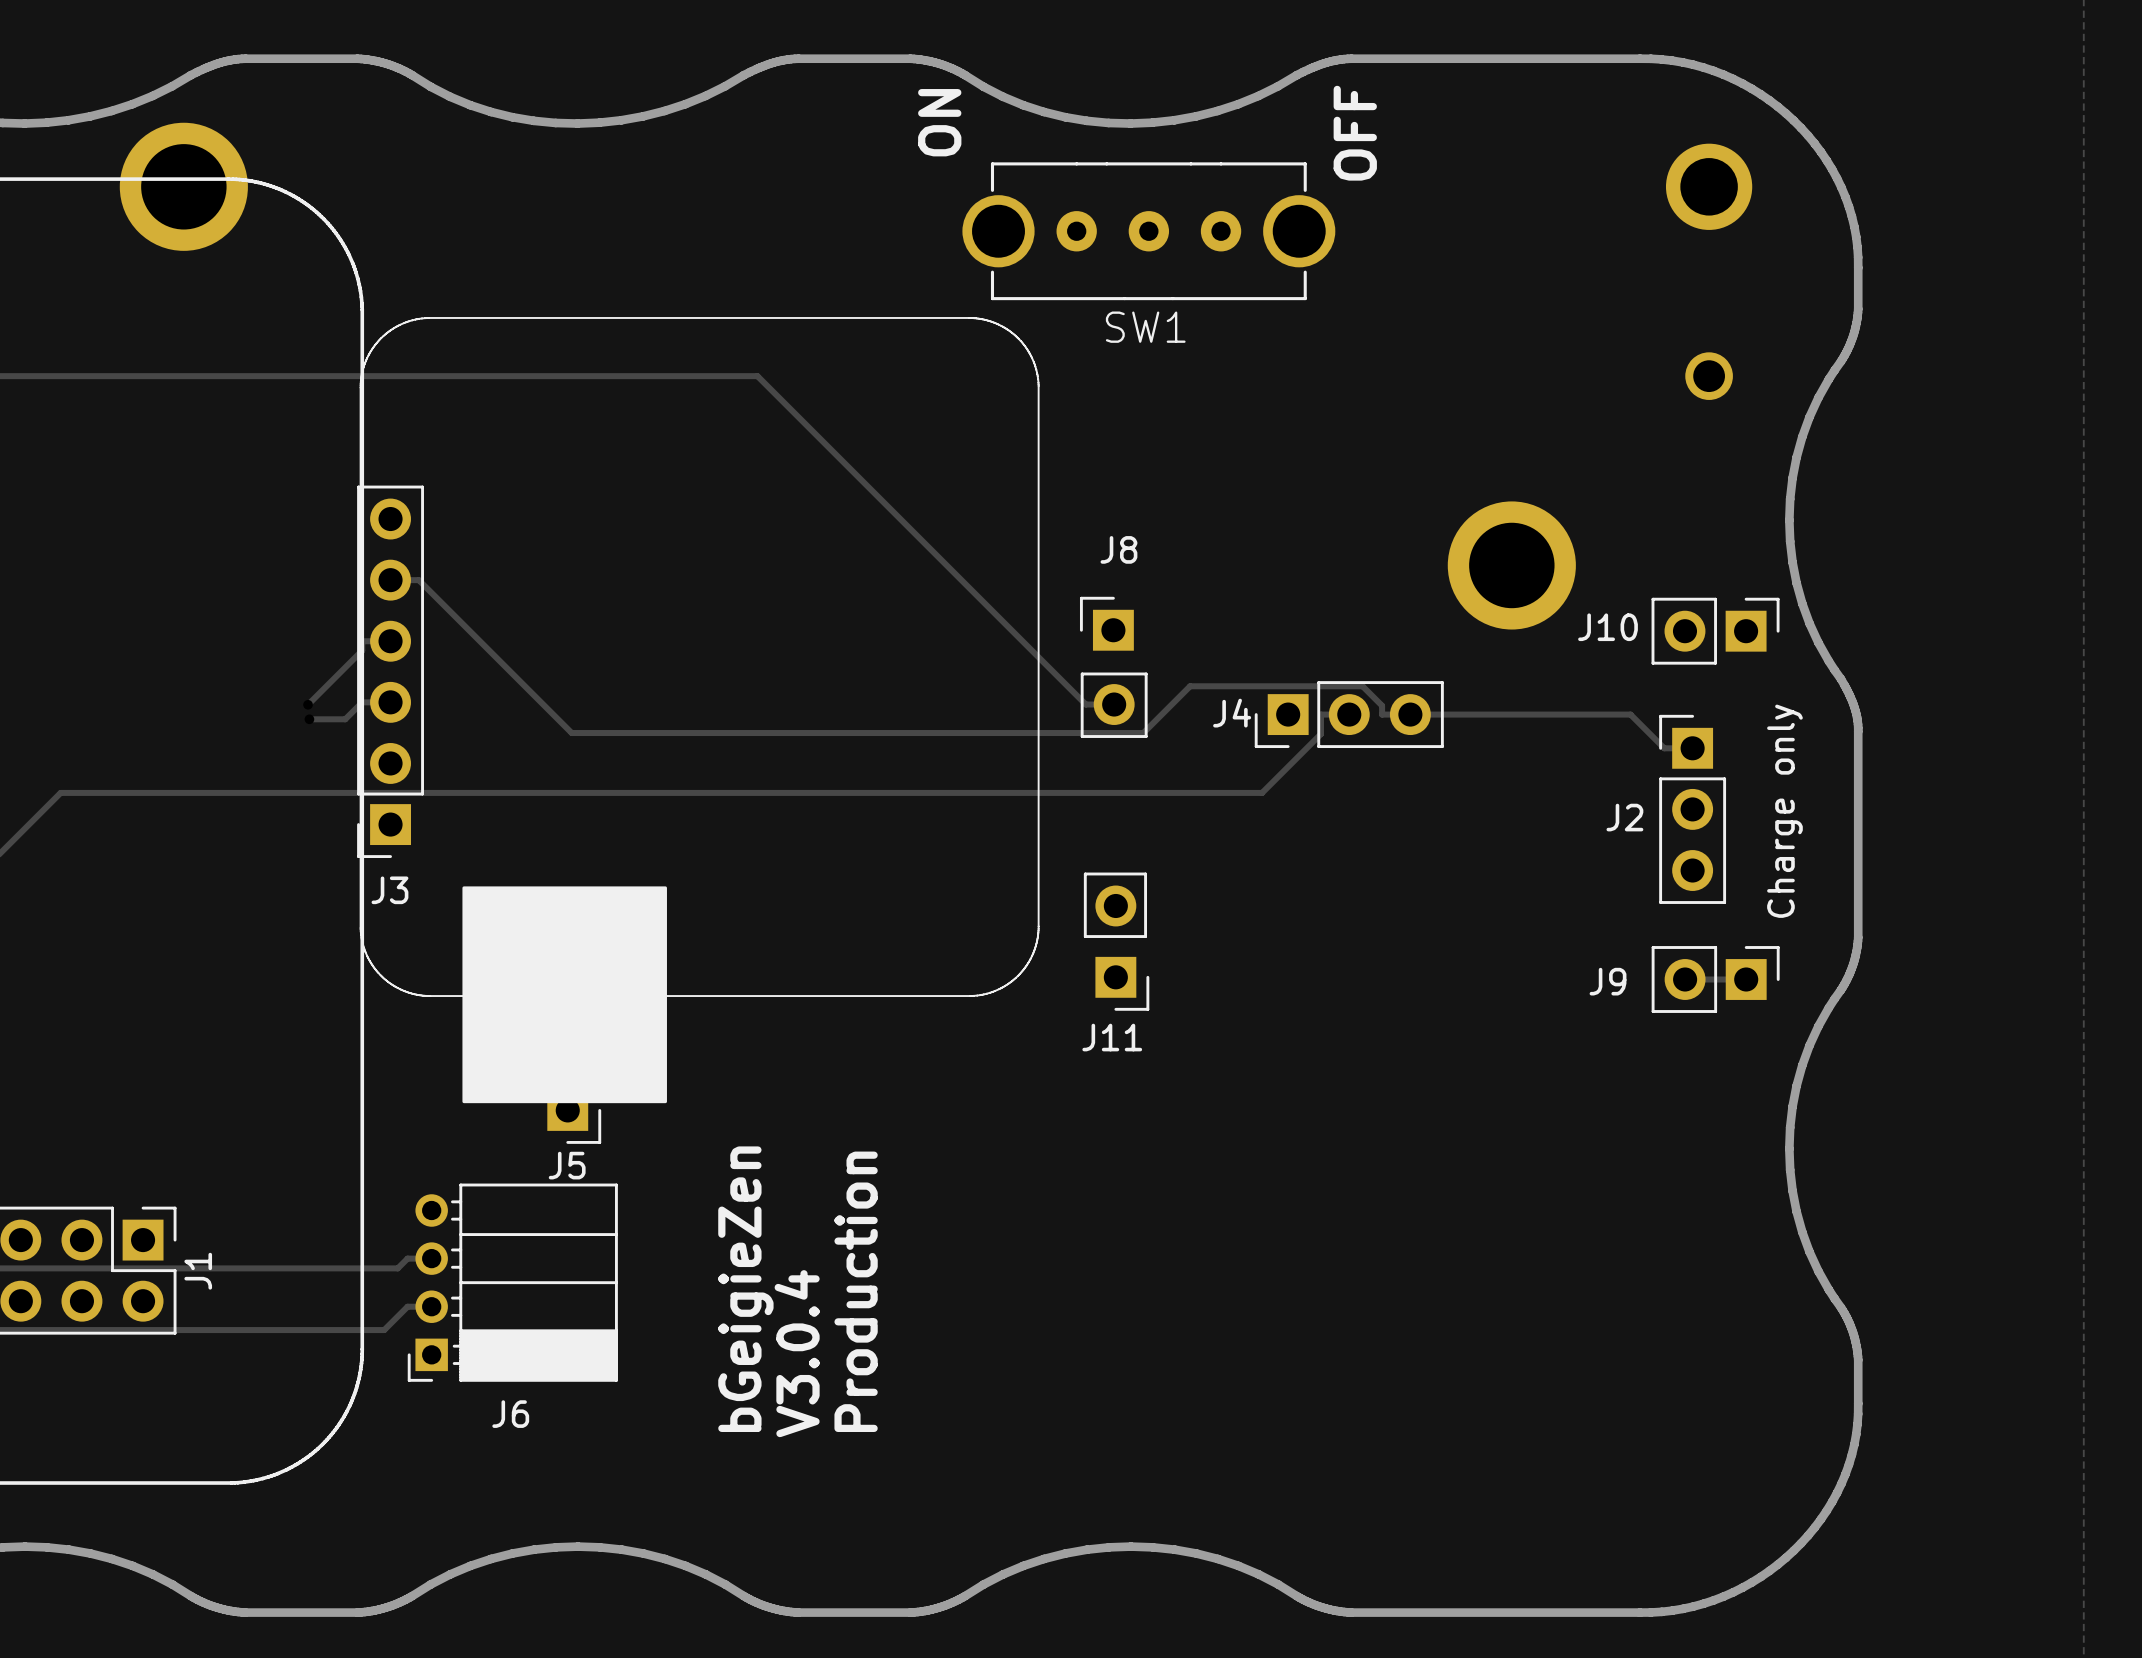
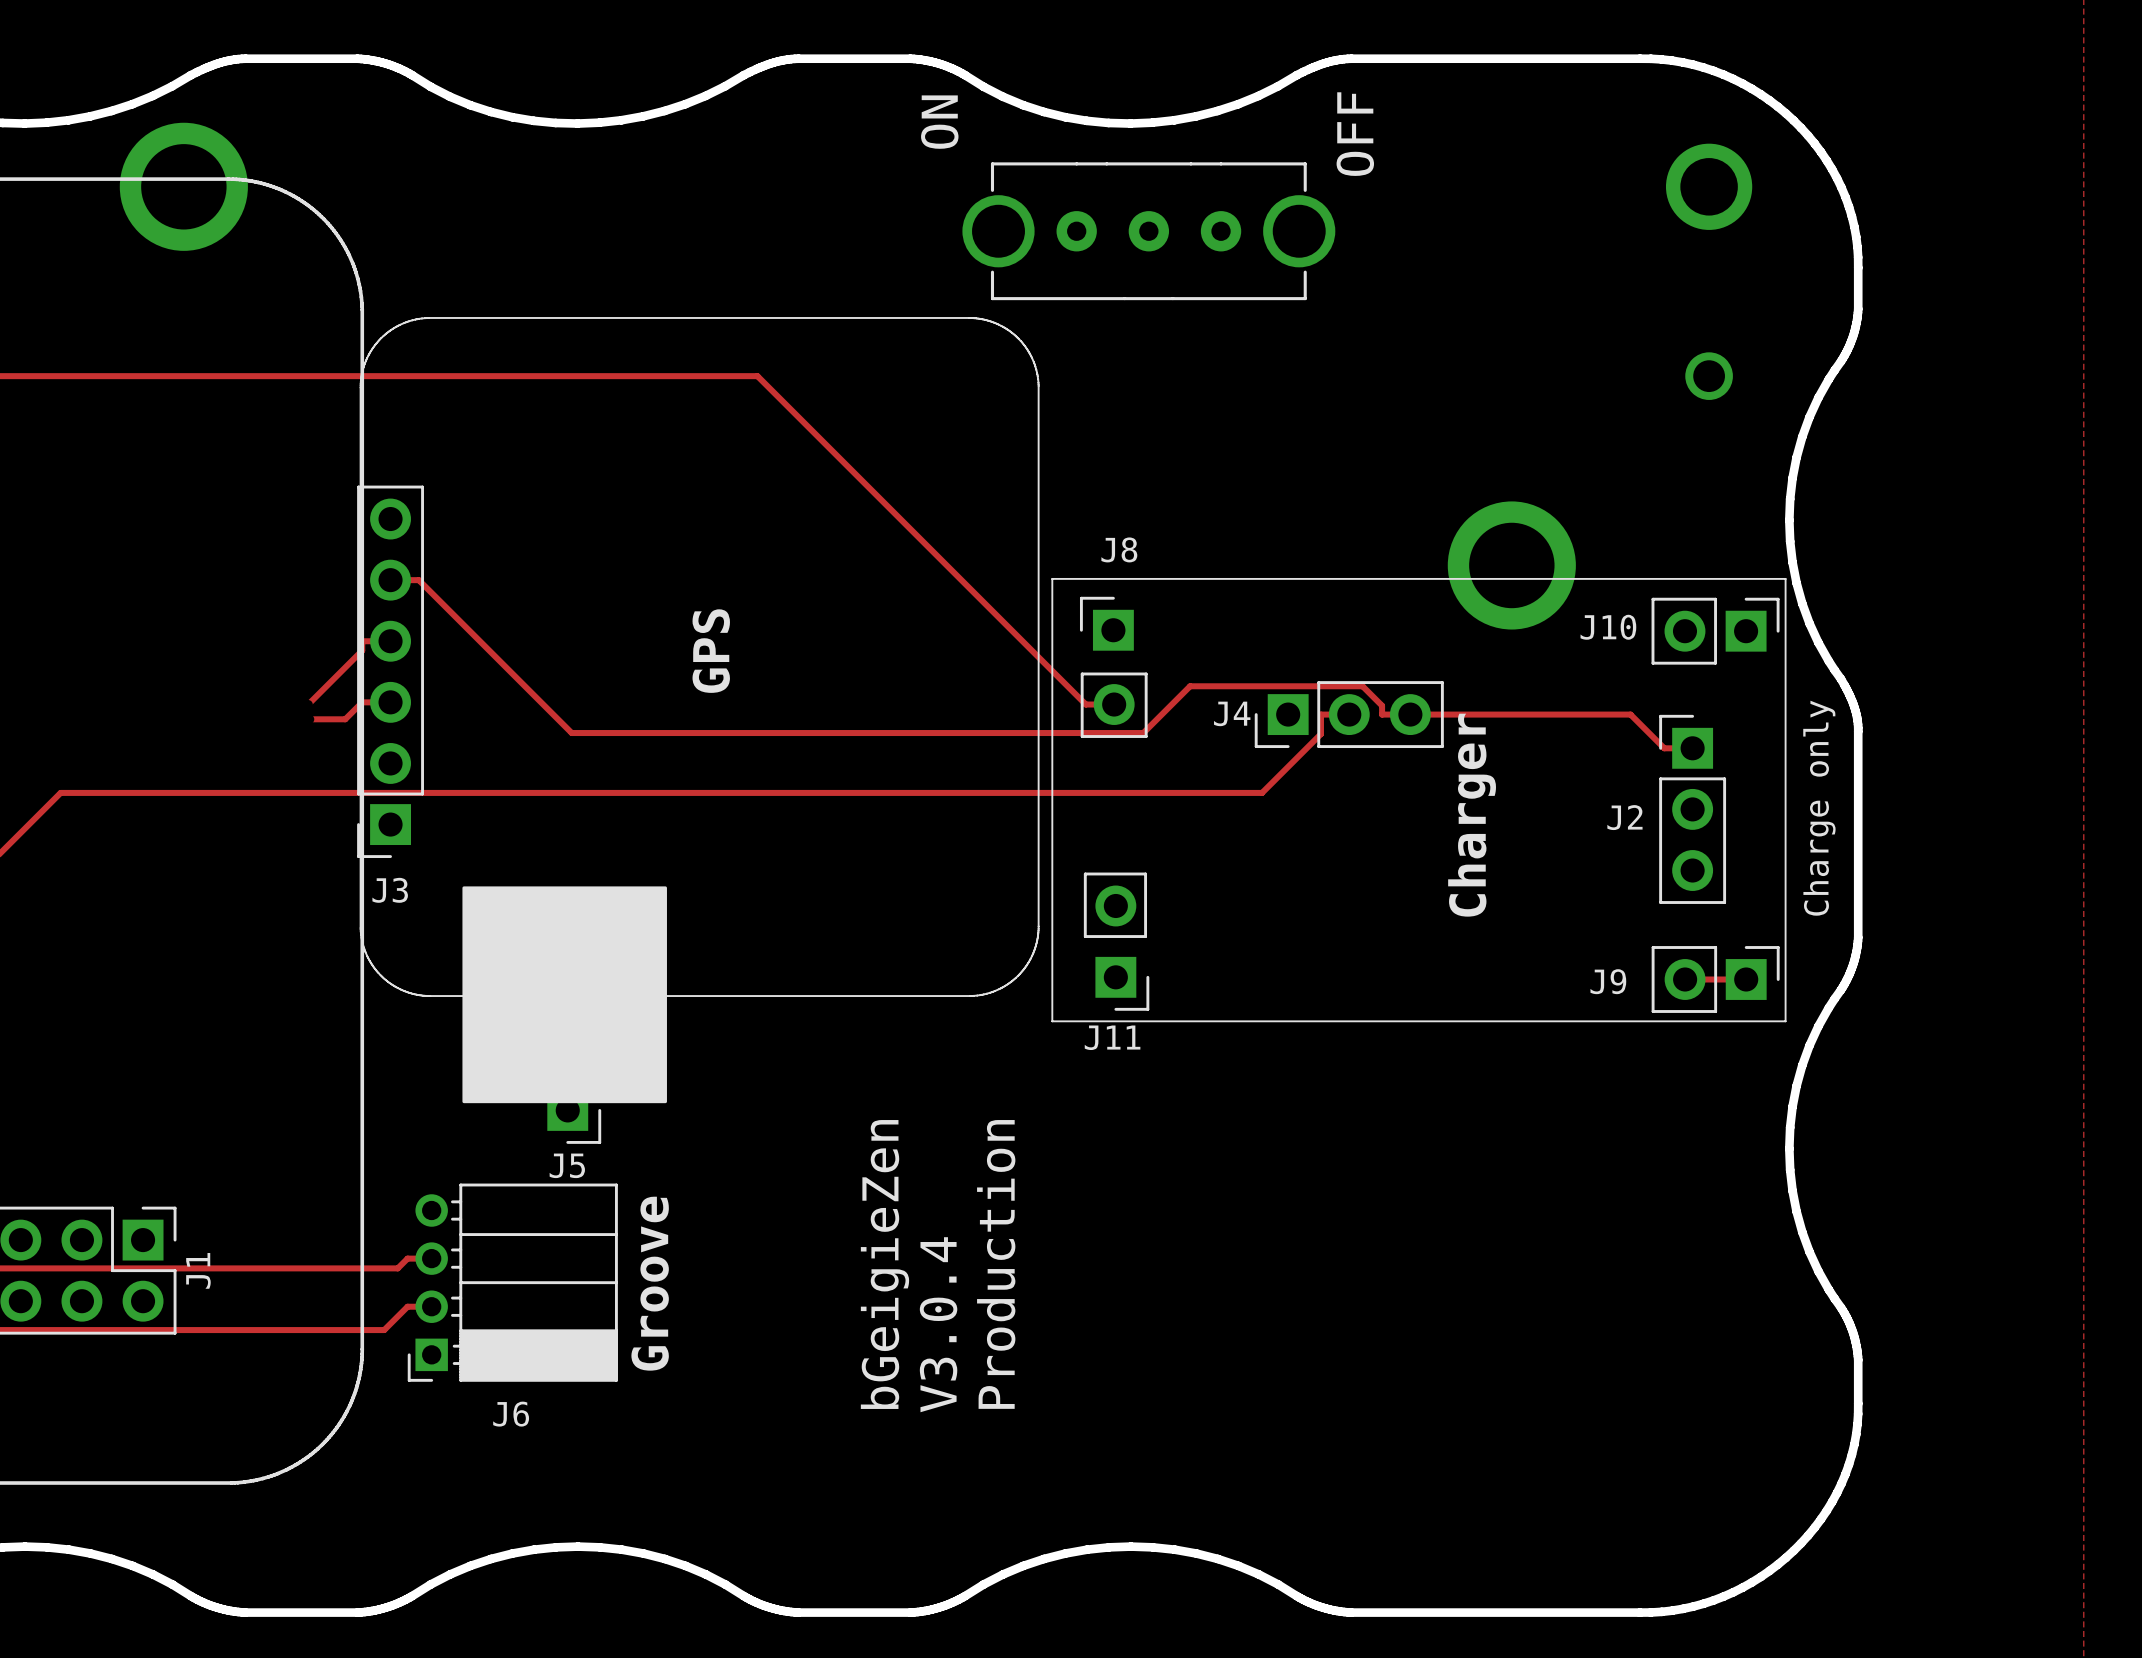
SW1 name: SW1 (1145, 327) -> none
line: none -> (1052, 578) (1785, 578) (1785, 1021) (1052, 1021) (1052, 578)
text: none -> GPS (711, 651)
text position: Charge only (1784, 811) -> Charge only (1819, 808)
text: none -> Charger (1472, 815)
text: none -> Groove (650, 1283)
text position: bGeigieZen (745, 1289) -> bGeigieZen (884, 1264)
text position: Production (856, 1291) -> Production (996, 1264)
text position: V3.0.4 (797, 1353) -> V3.0.4 (938, 1324)

